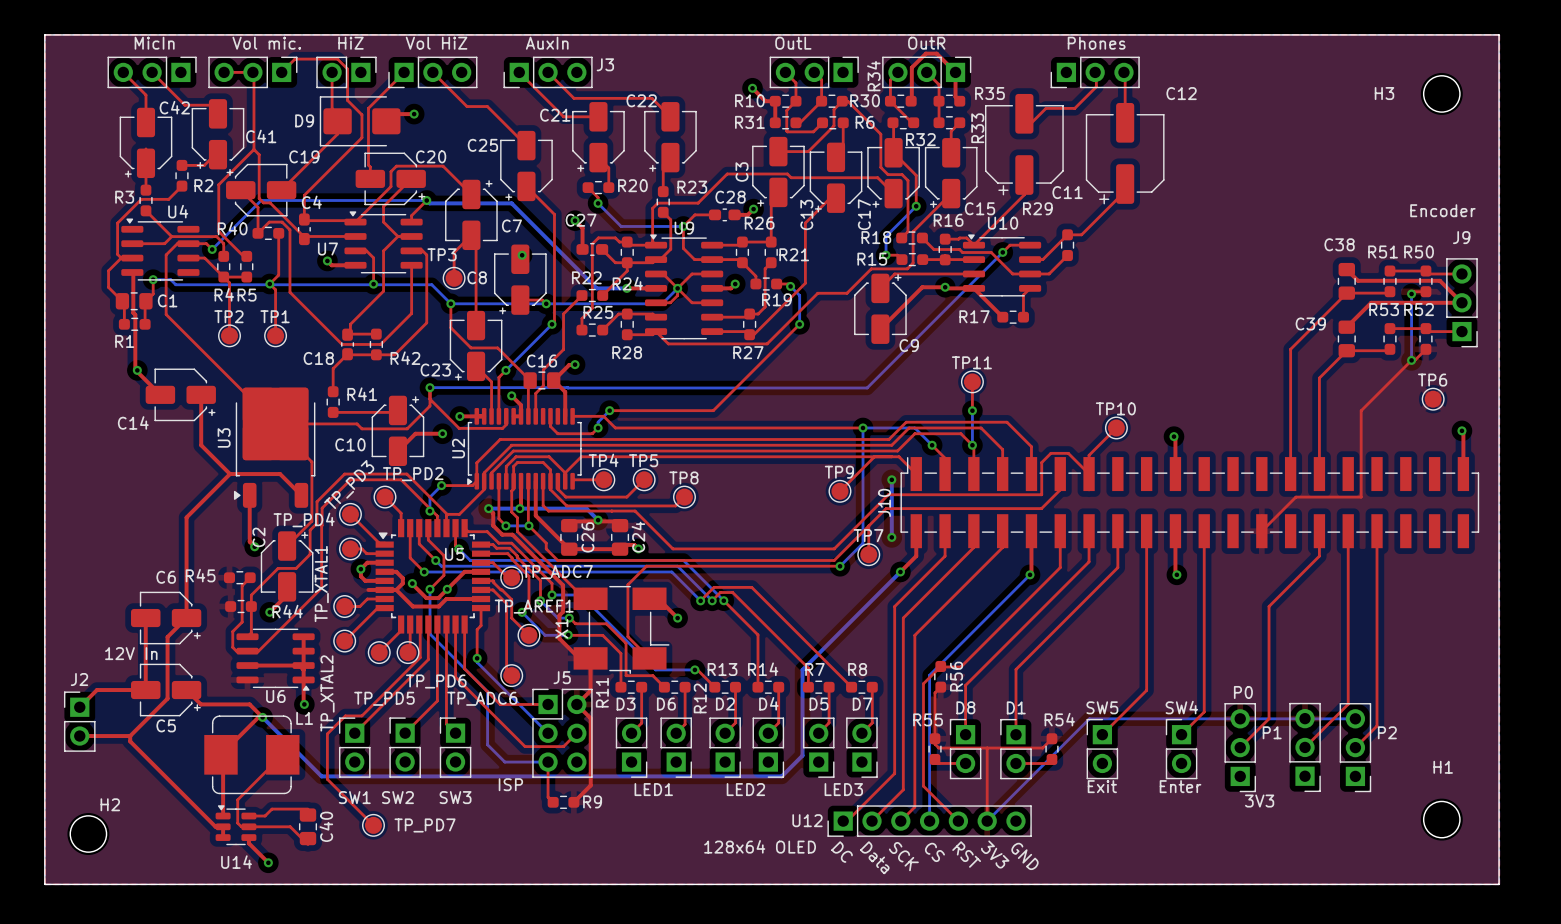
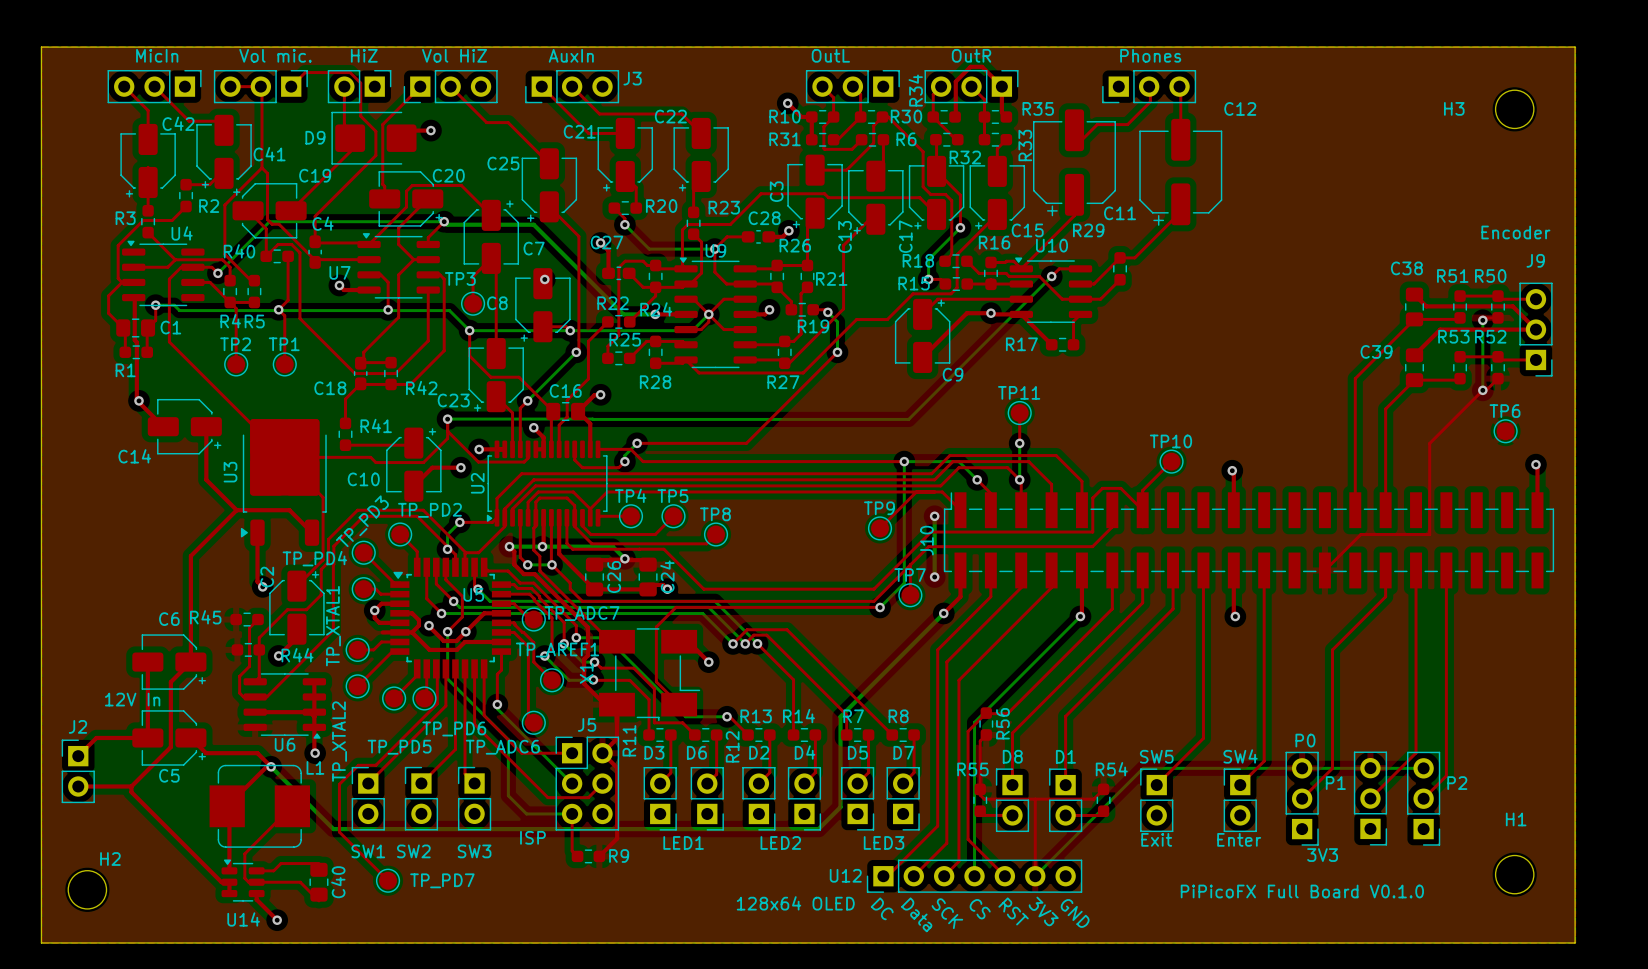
text: none -> PiPicoFX Full Board V0.1.0 (1302, 891)

